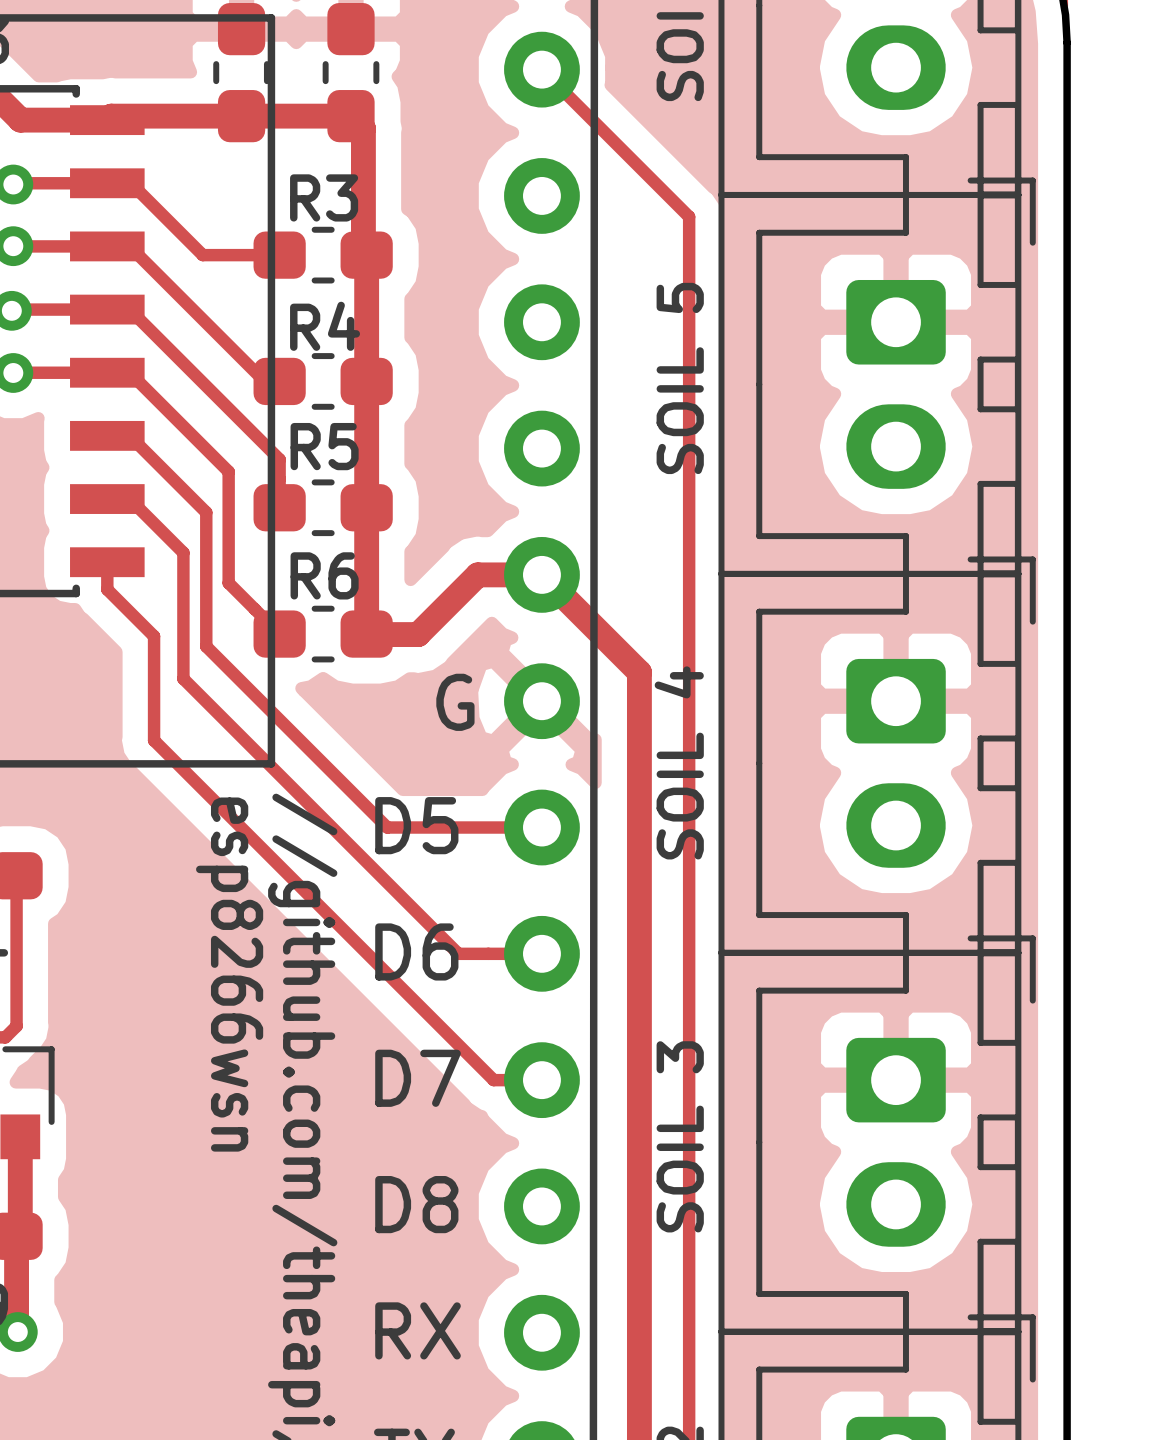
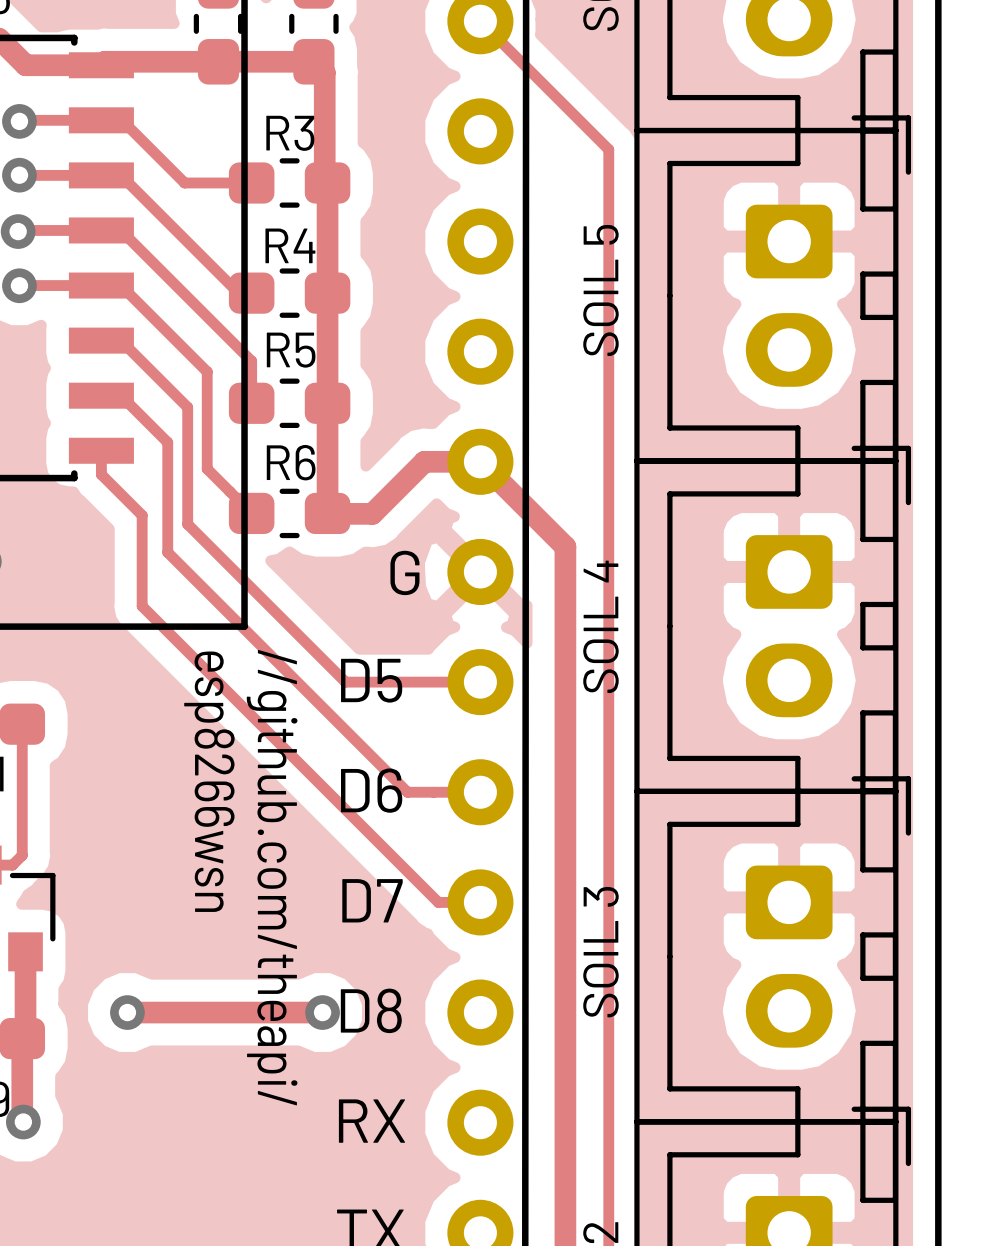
track: none -> (127, 1012) (322, 1012)
via: none -> (127, 1012)
via: none -> (322, 1012)

